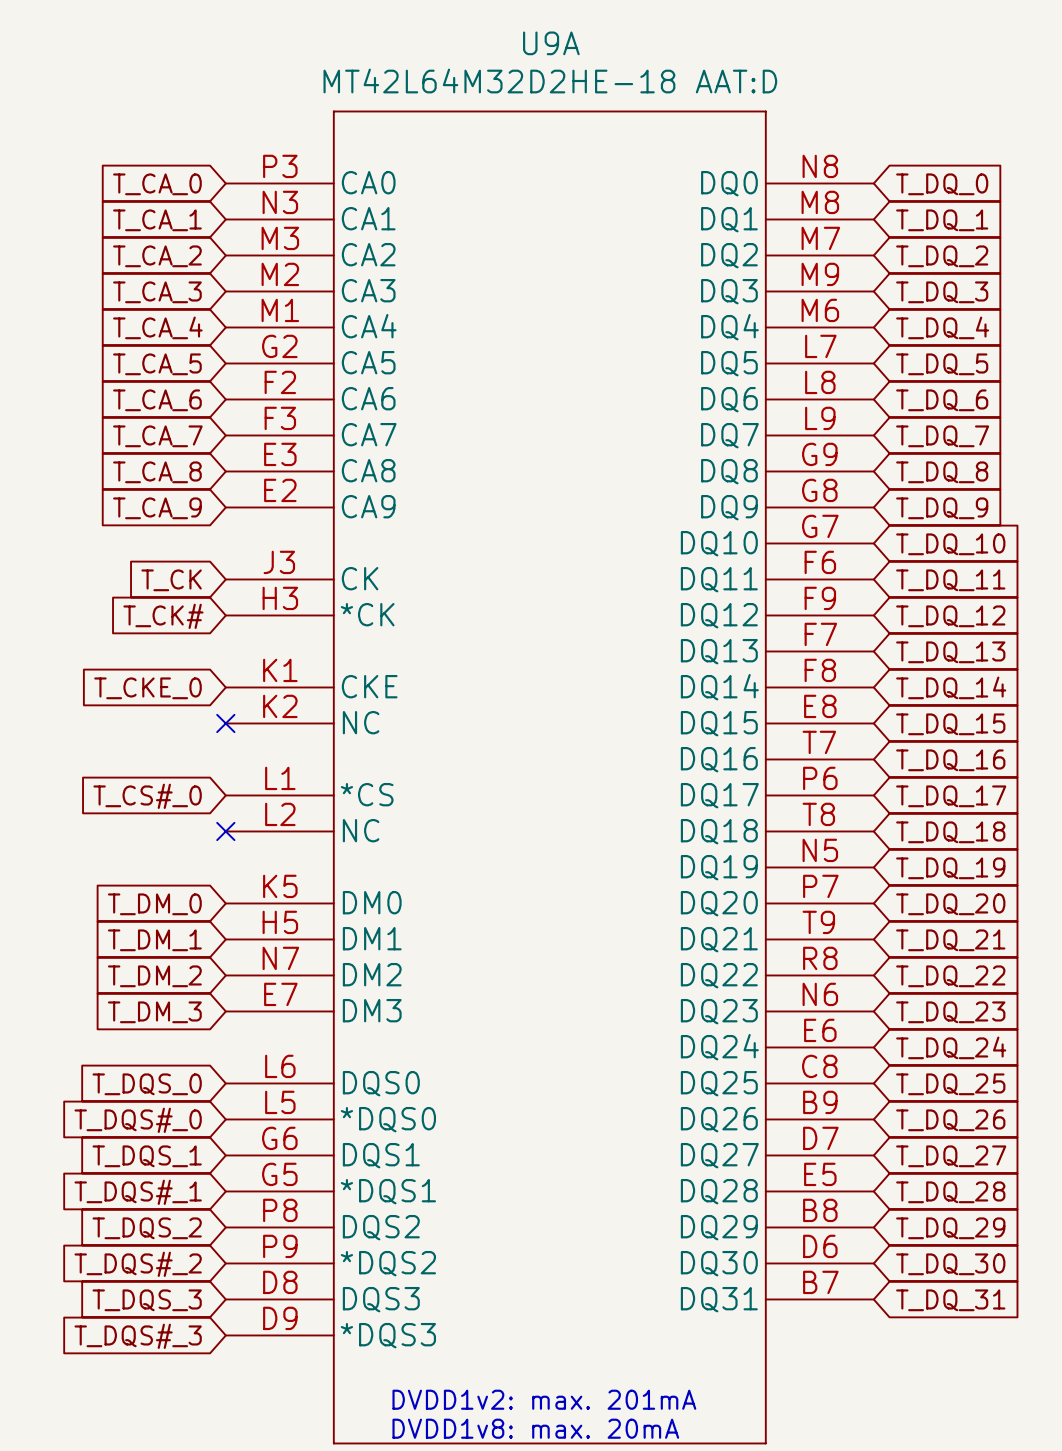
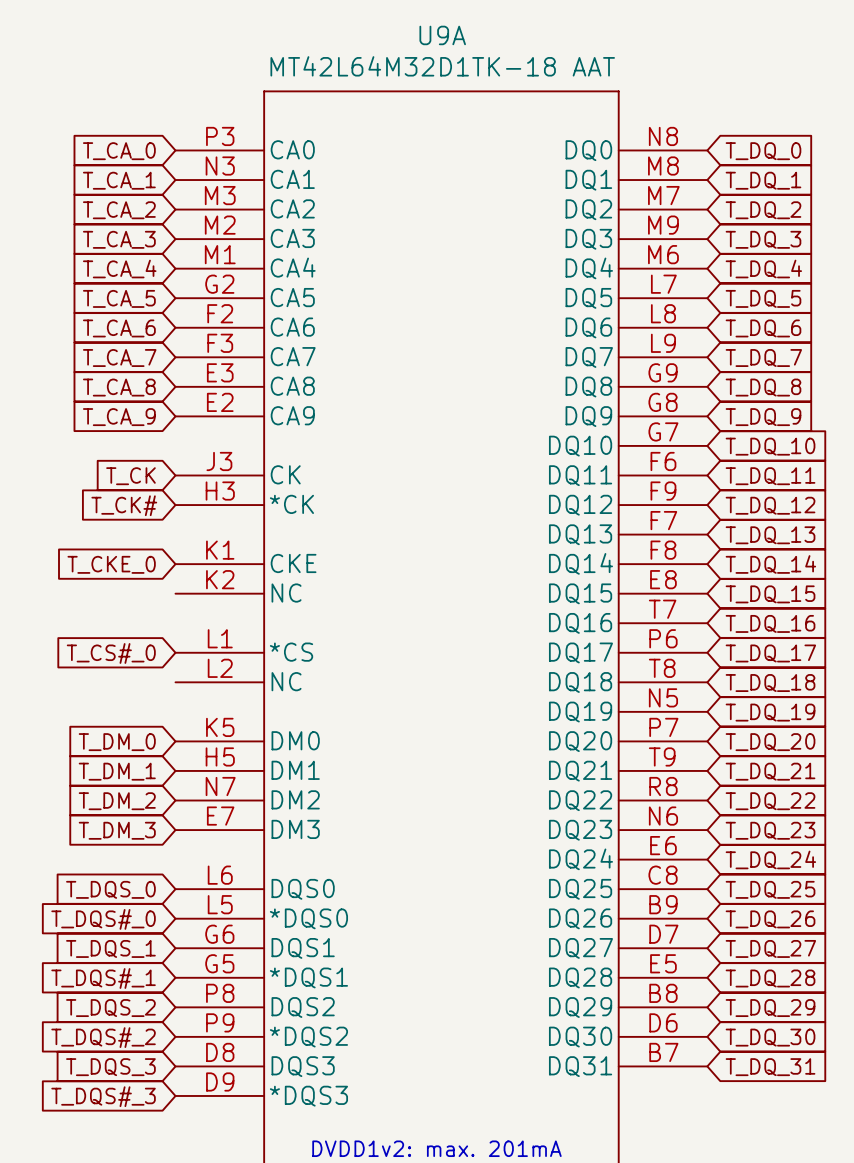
U9A value: MT42L64M32D2HE-18 AAT:D (550, 81) -> MT42L64M32D1TK-18 AAT (442, 66)
no-connect mark: (225, 723) -> none
no-connect mark: (225, 831) -> none

